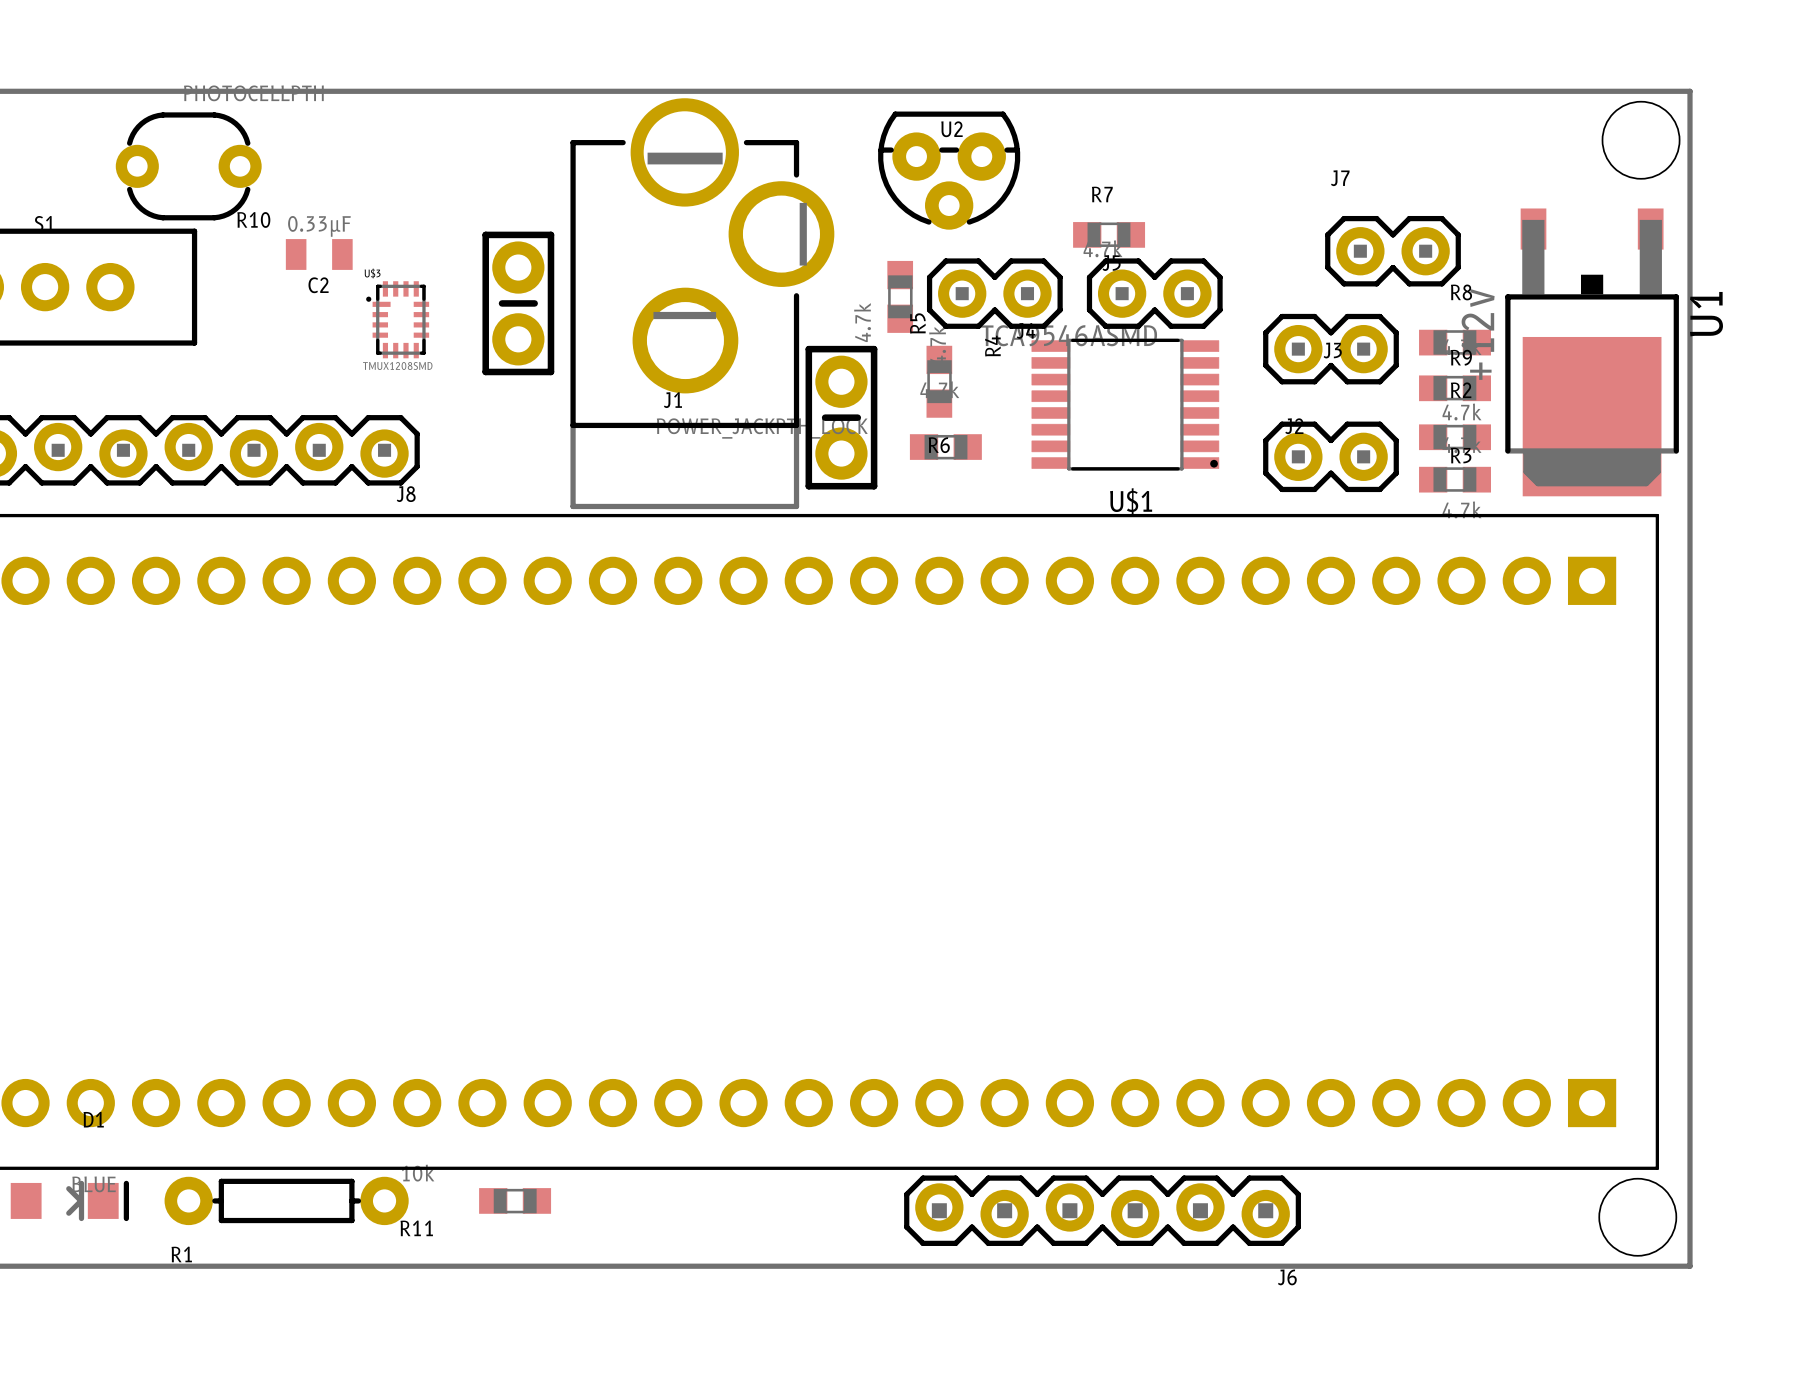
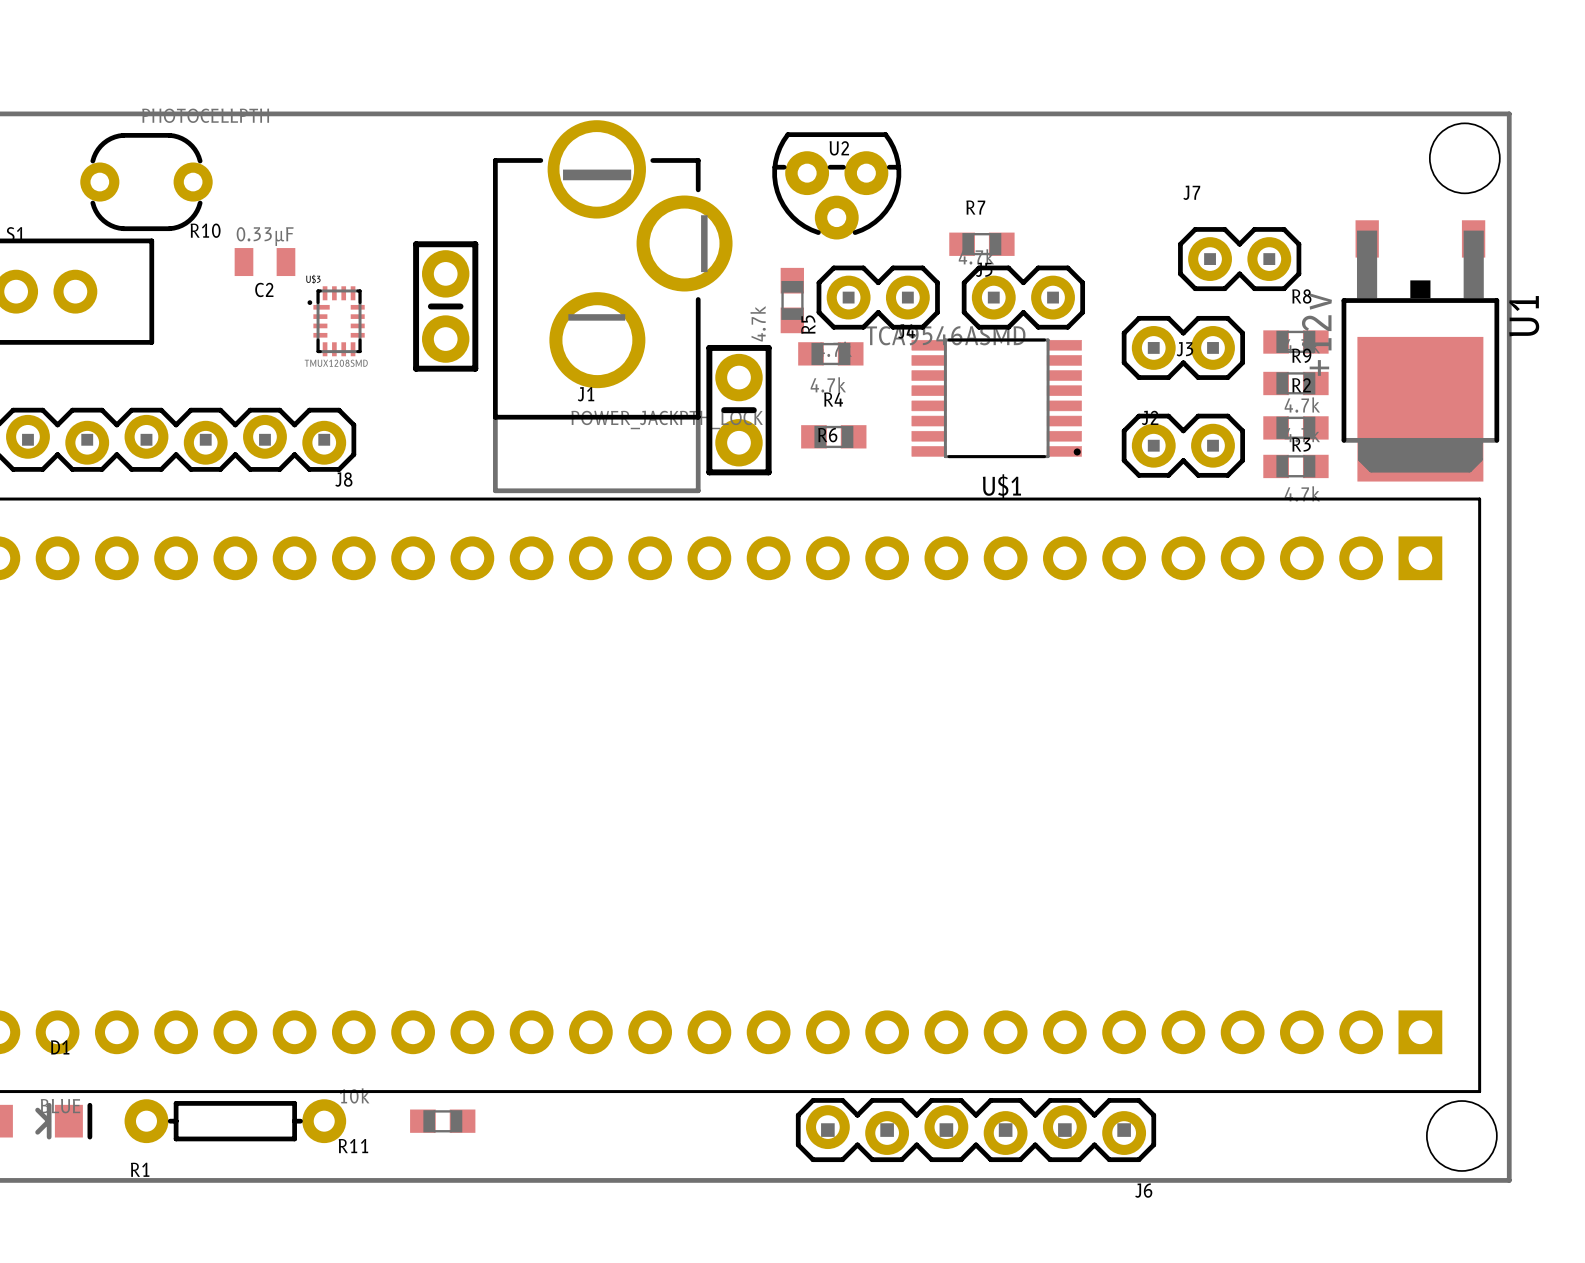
R4 rotation: 0° (939, 381) -> 90° clockwise (830, 353)

